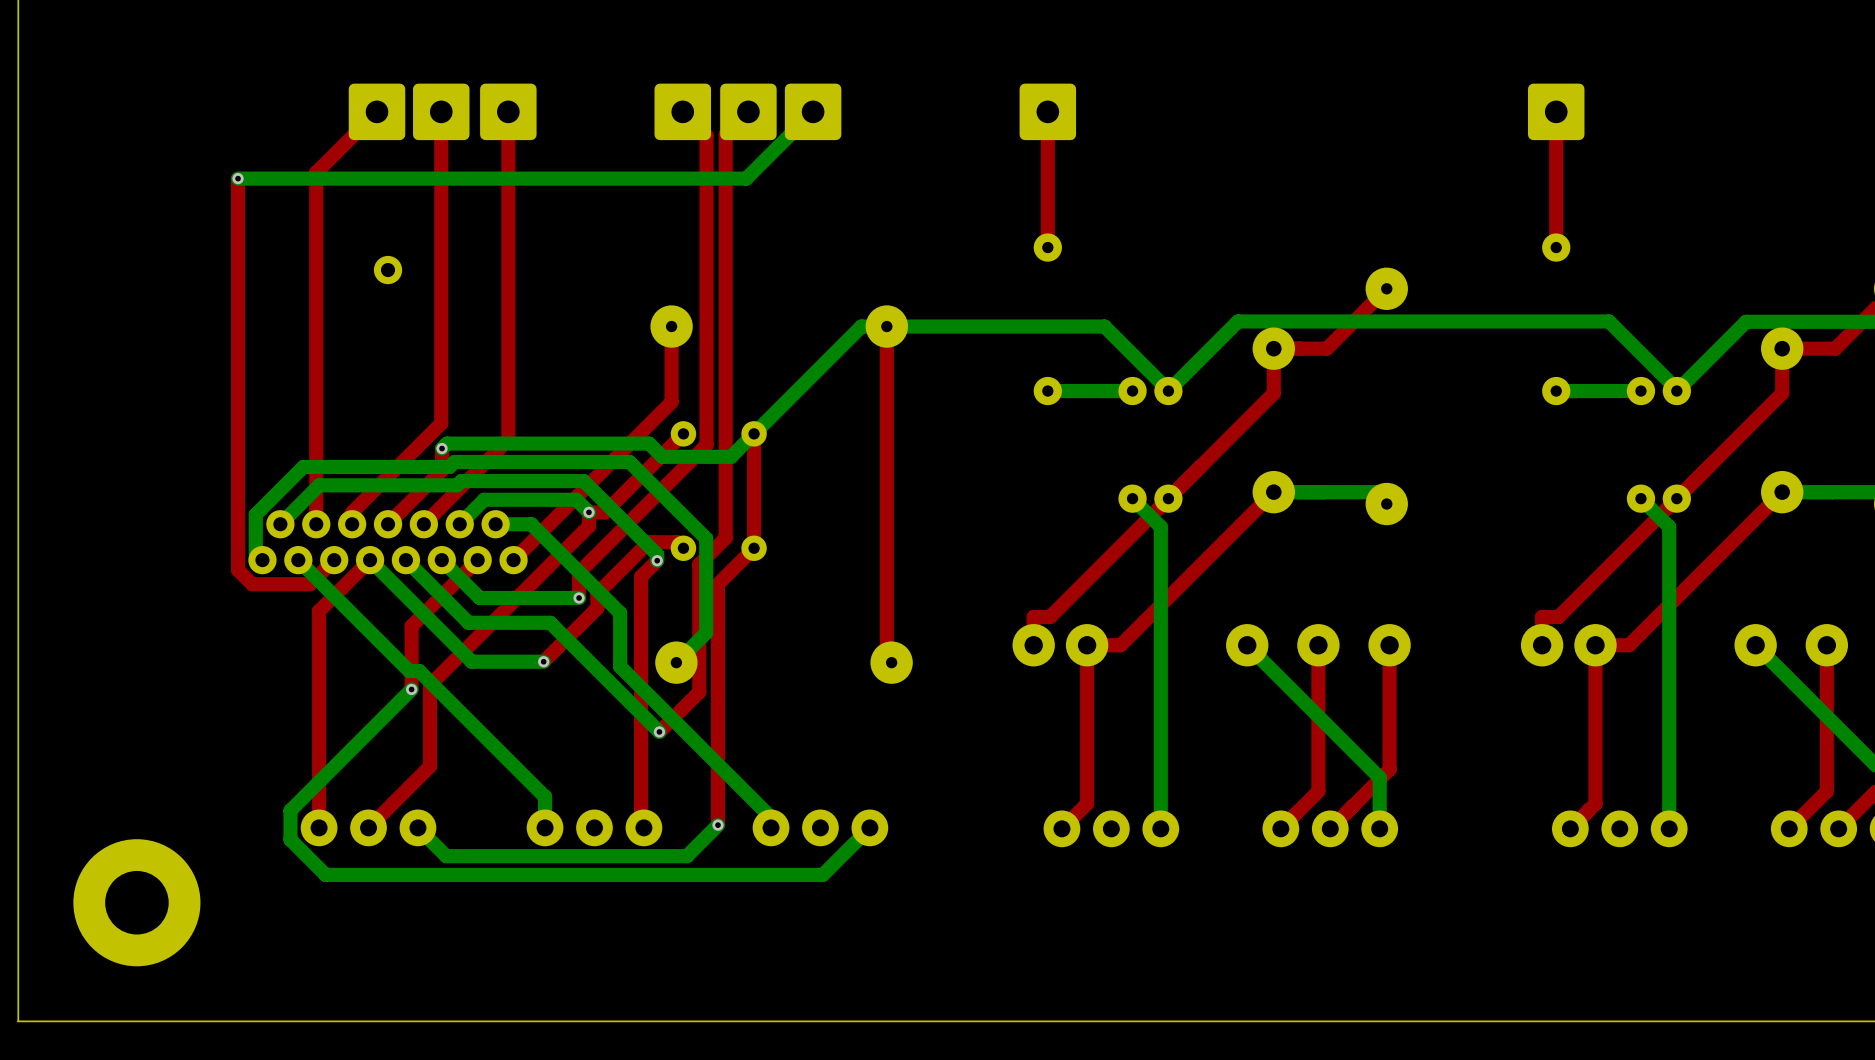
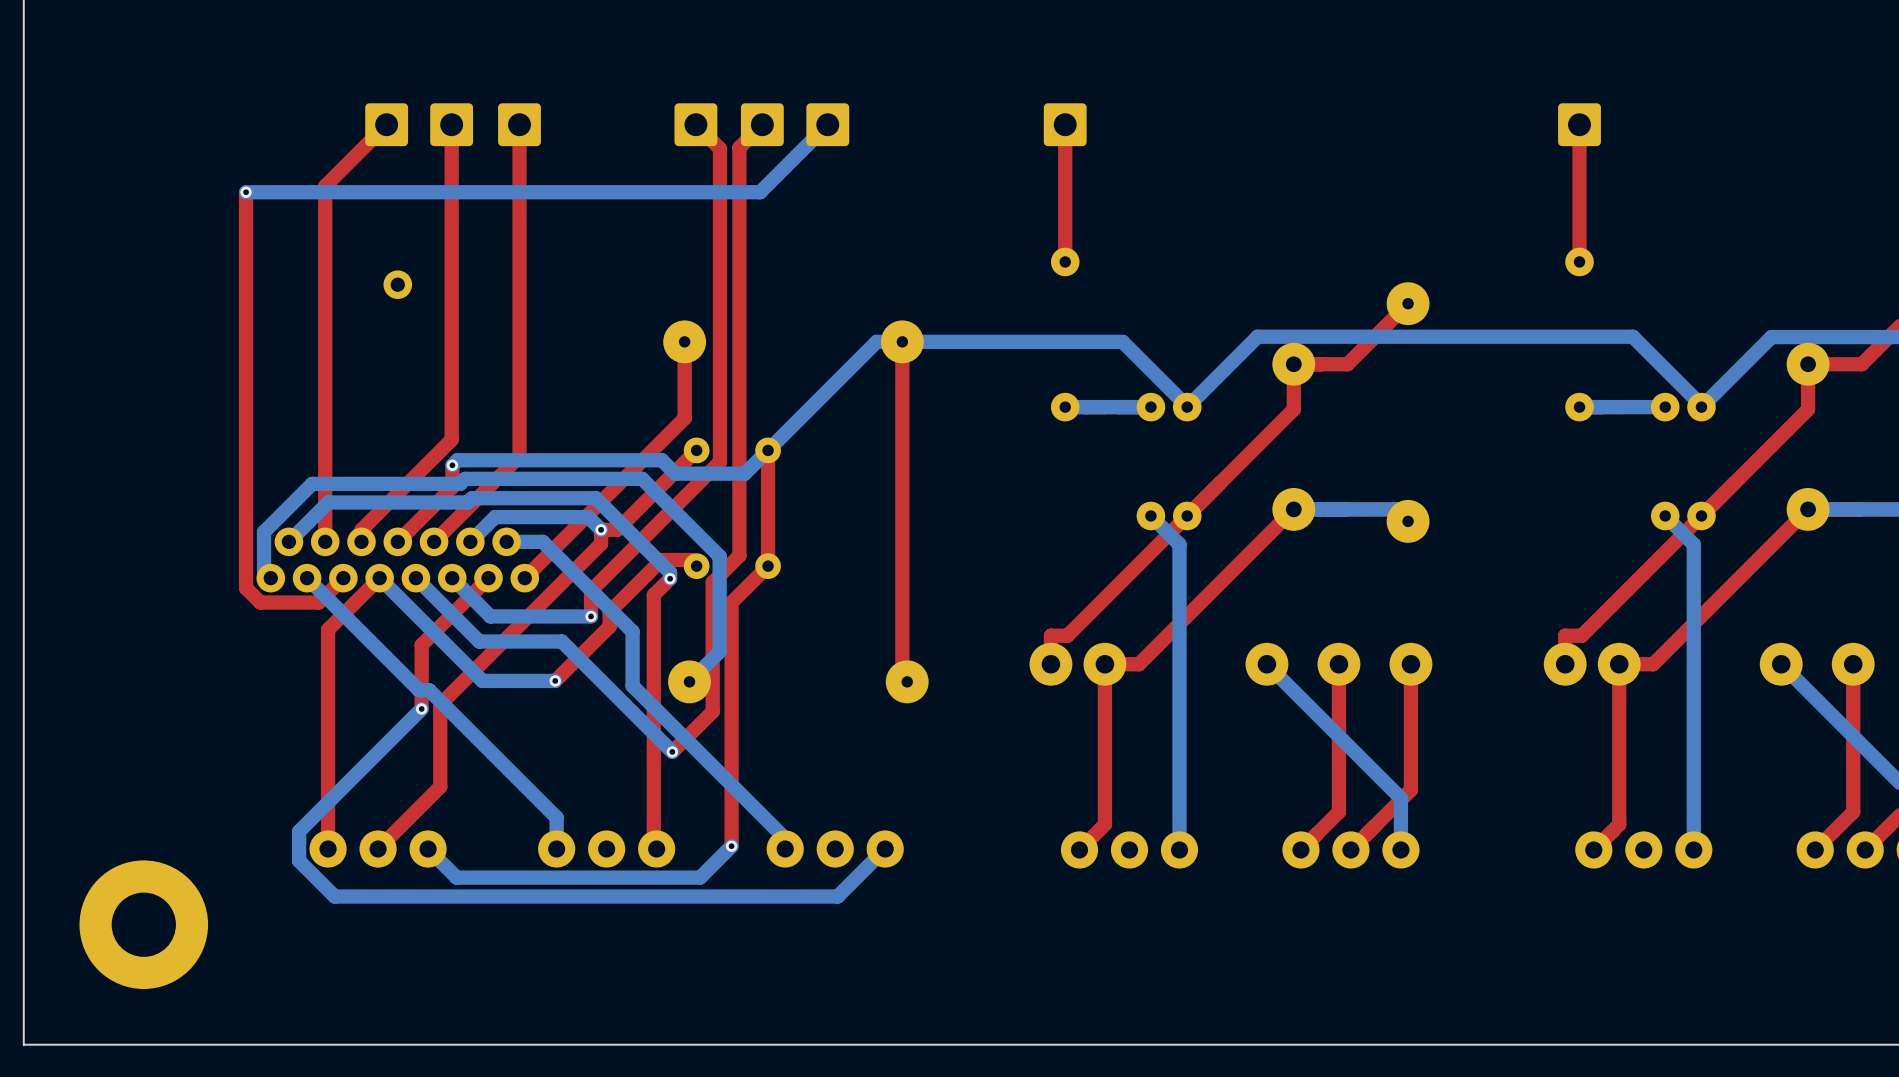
part footprint: [348, 83, 406, 141] -> [365, 103, 409, 147]
part footprint: [413, 83, 470, 141] -> [430, 103, 474, 147]
part footprint: [480, 83, 537, 141] -> [498, 103, 541, 147]
part footprint: [654, 83, 712, 141] -> [674, 103, 718, 147]
part footprint: [720, 83, 777, 141] -> [740, 103, 784, 147]
part footprint: [784, 83, 842, 141] -> [806, 103, 850, 147]
part footprint: [1019, 83, 1077, 141] -> [1043, 103, 1087, 147]
part footprint: [1527, 83, 1585, 141] -> [1558, 103, 1601, 147]

